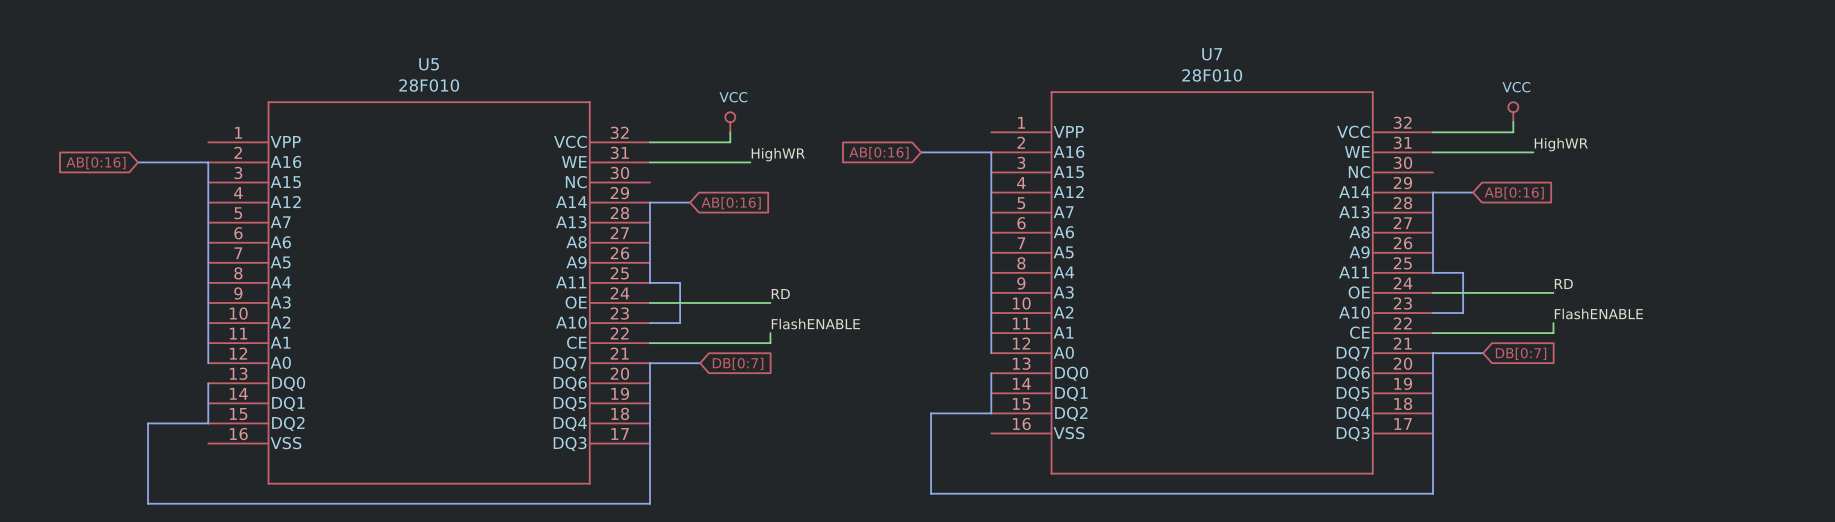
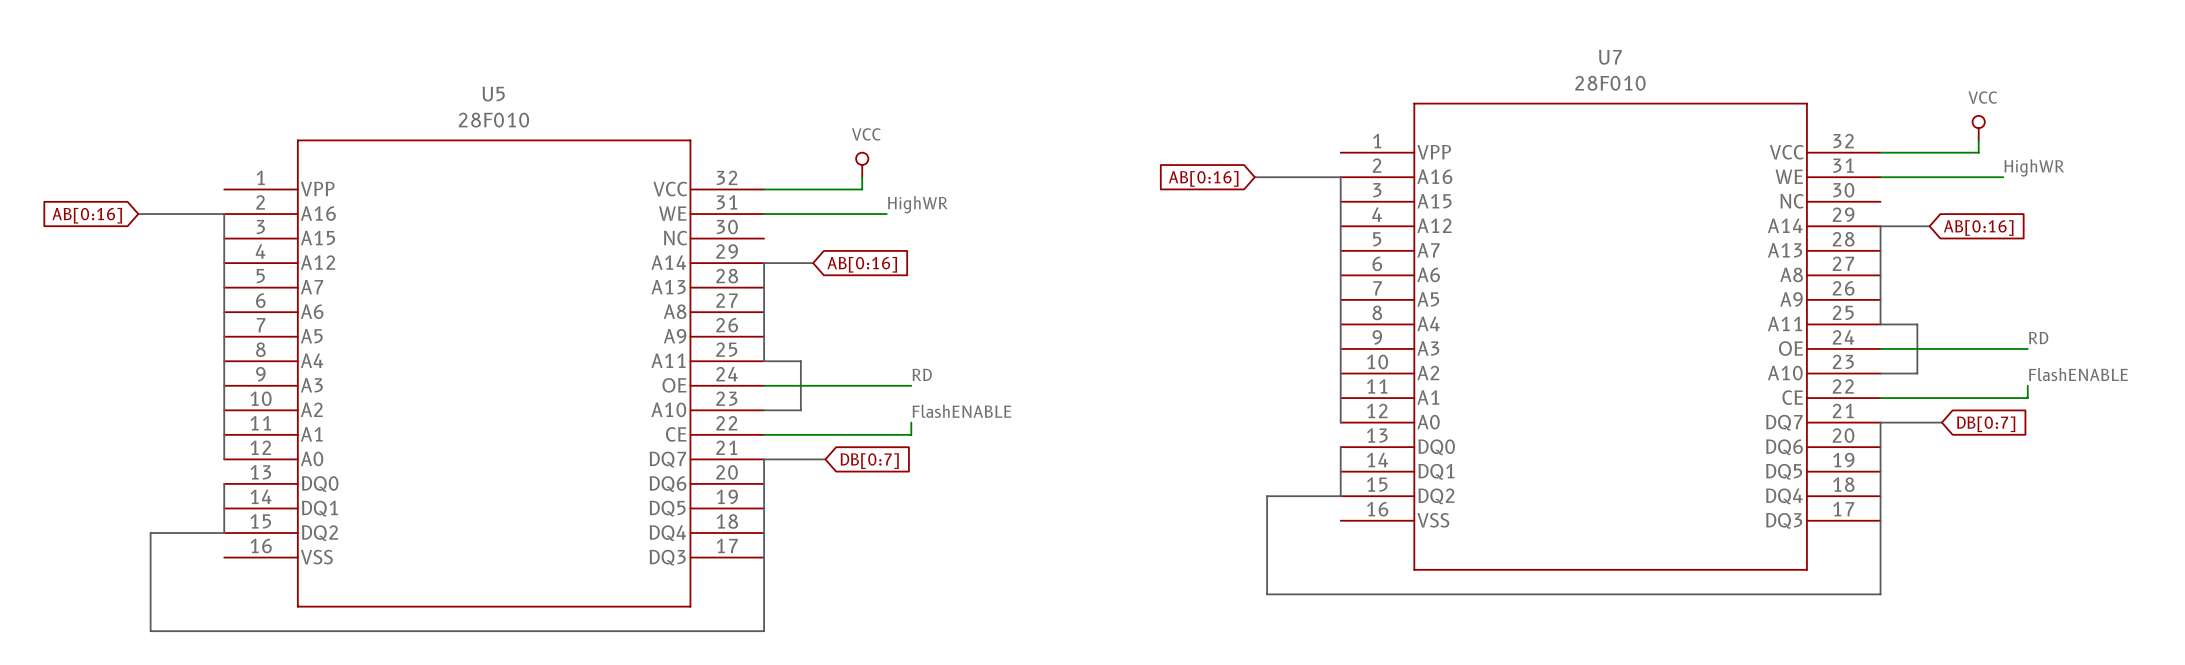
power symbol position: VCC (1513, 112) -> VCC (1978, 128)
wire: (1513, 122) (1513, 132) (1433, 132) -> (1978, 140) (1978, 152) (1880, 152)
label position: HighWR (1561, 144) -> HighWR (2034, 167)
bus: (921, 152) (991, 152) (991, 353) -> (1254, 177) (1340, 177) (1340, 422)
wire: (1433, 152) (1533, 152) -> (1880, 177) (2003, 177)
global label position: AB[0:16] (878, 153) -> AB[0:16] (1203, 178)
bus: (1473, 192) (1433, 192) (1433, 272) (1463, 272) (1463, 313) (1433, 313) -> (1929, 226) (1880, 226) (1880, 324) (1917, 324) (1917, 373) (1880, 373)
global label position: AB[0:16] (1514, 193) -> AB[0:16] (1978, 227)
U7 position: (1212, 282) -> (1610, 336)
label position: RD (1563, 283) -> RD (2038, 338)
wire: (1433, 292) (1553, 292) -> (1880, 348) (2027, 348)
label position: FlashENABLE (1598, 313) -> FlashENABLE (2078, 374)
wire: (1553, 323) (1553, 333) (1433, 333) -> (2027, 385) (2027, 398) (1880, 398)
bus: (1483, 353) (1433, 353) (1433, 493) (931, 493) (931, 413) (991, 413) (991, 373) -> (1941, 422) (1880, 422) (1880, 594) (1267, 594) (1267, 496) (1340, 496) (1340, 447)
global label position: DB[0:7] (1521, 353) -> DB[0:7] (1986, 424)

